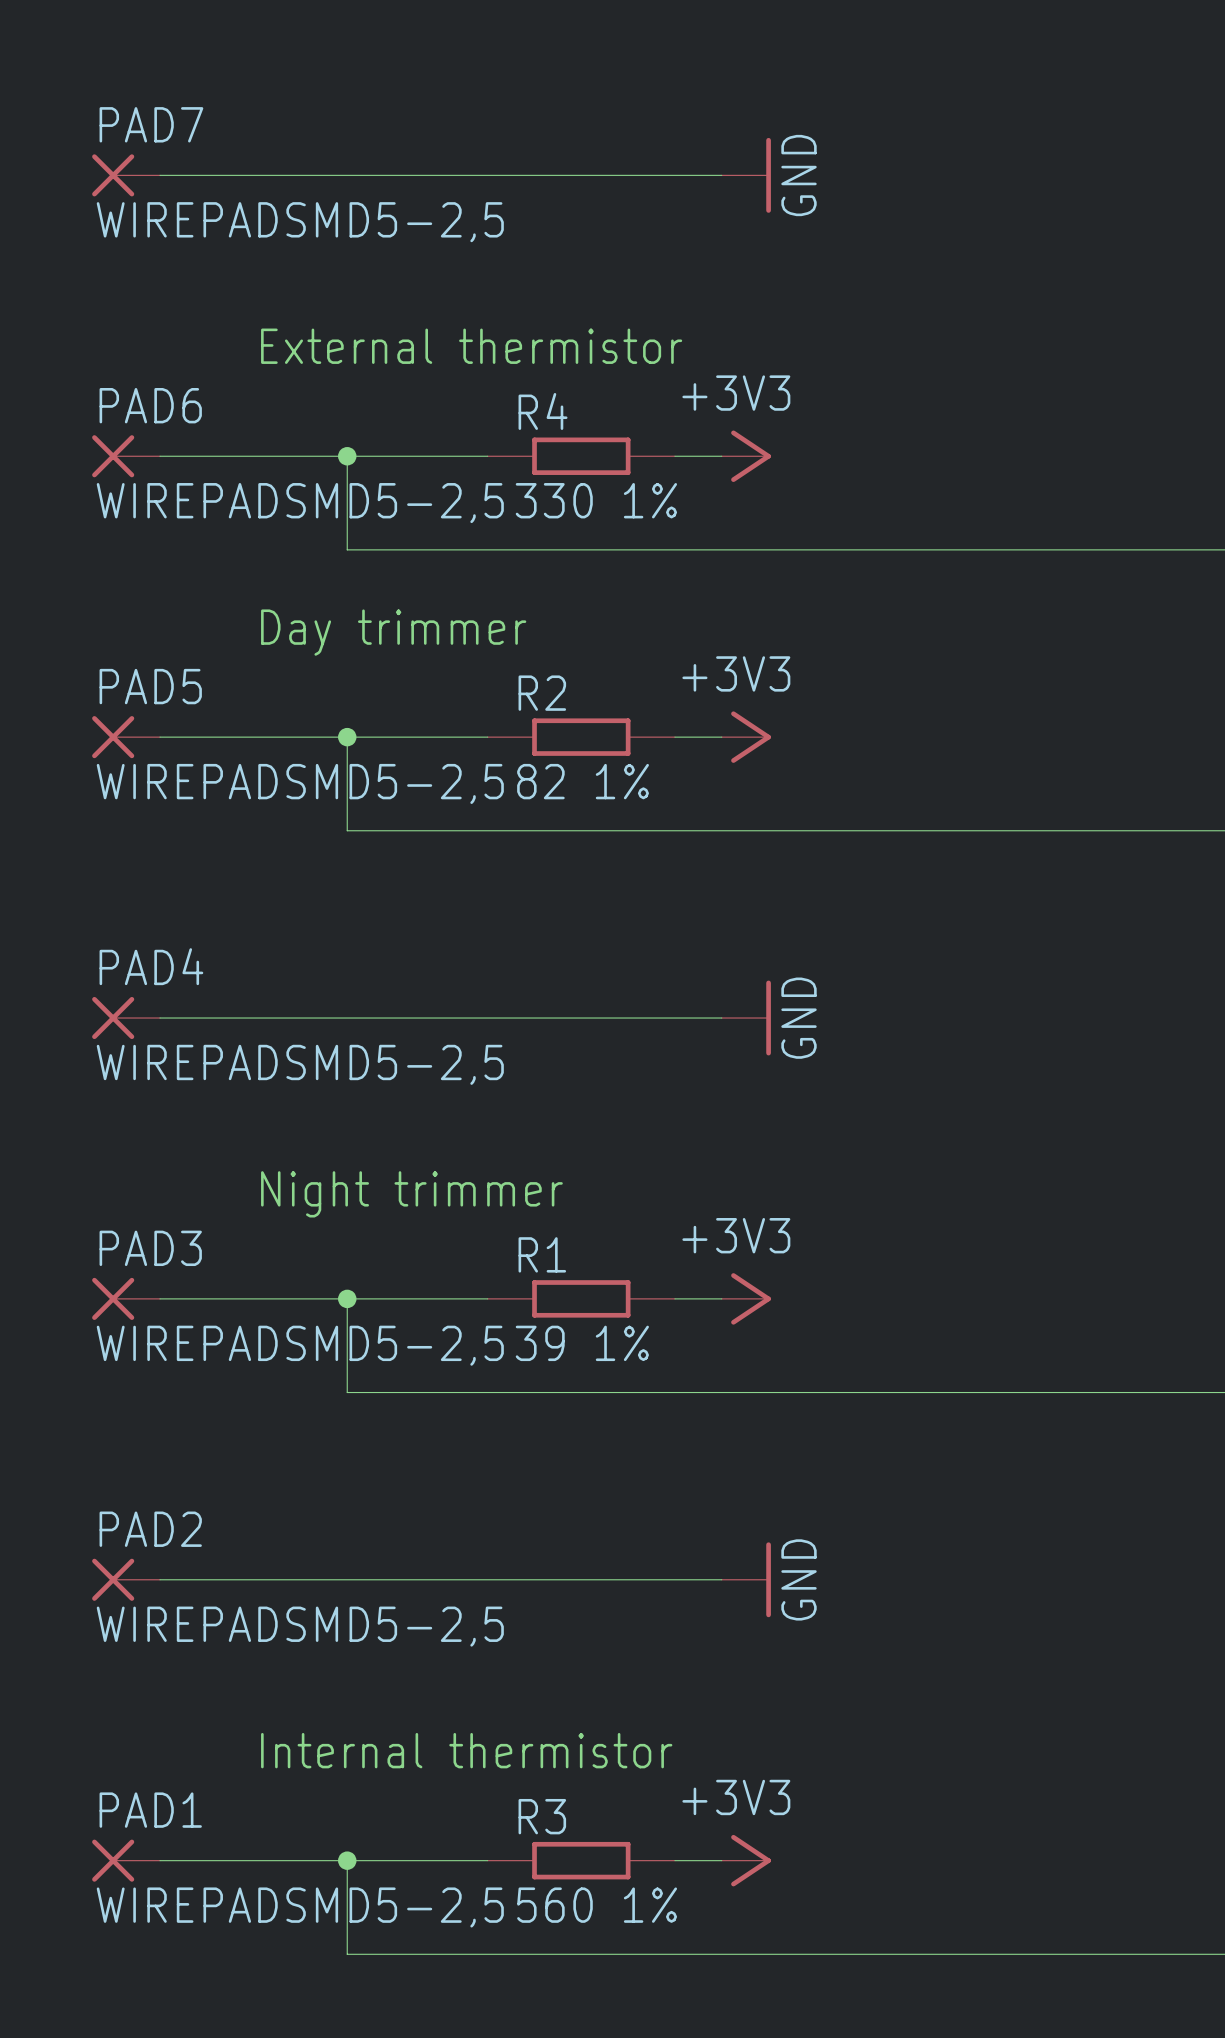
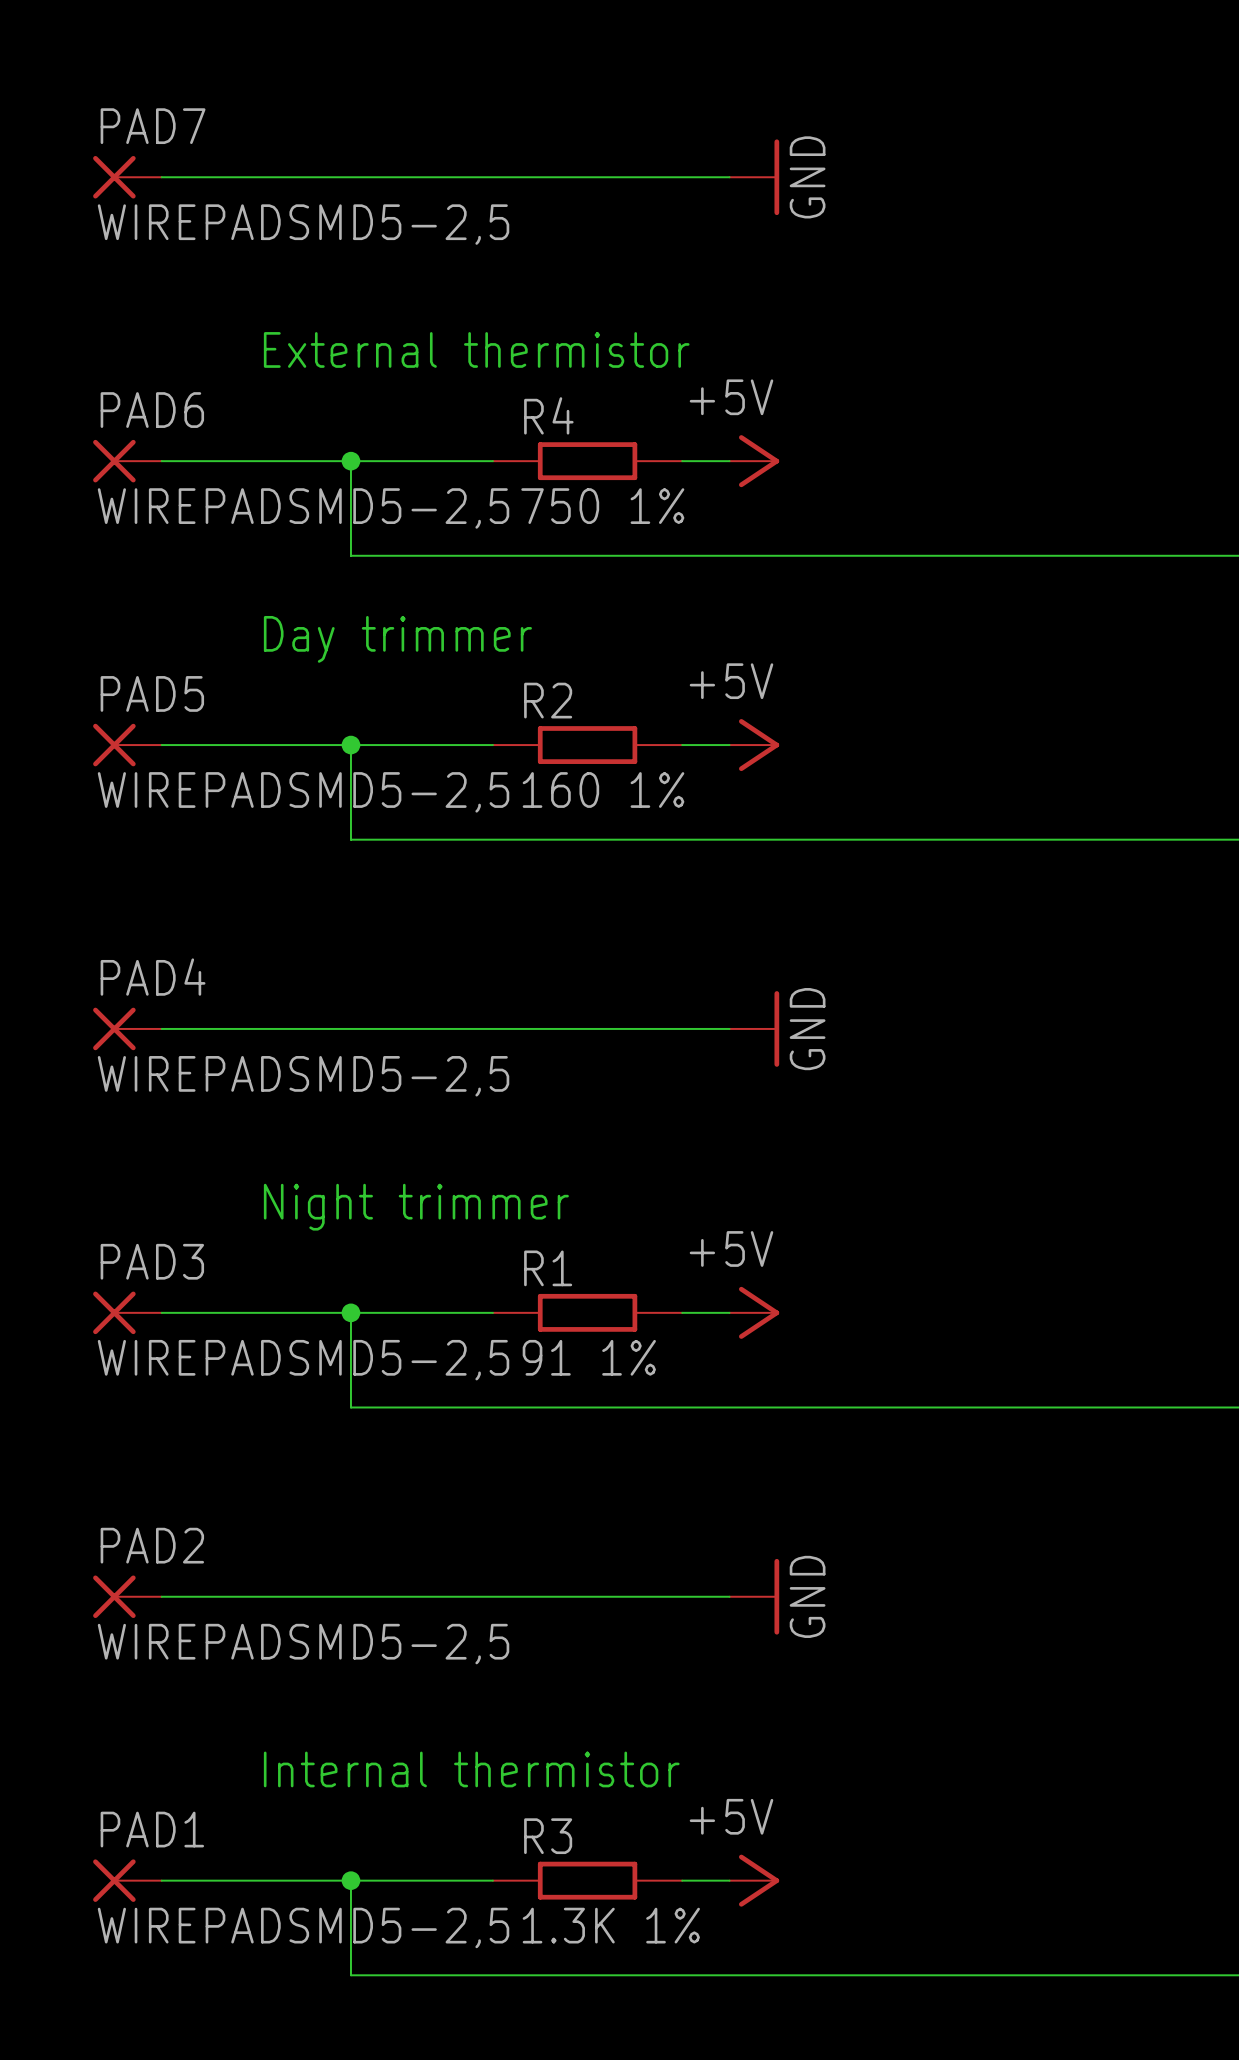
power symbol: +3V3 (746, 456) -> +5V (754, 461)
R4 value: 330 1% (596, 500) -> 750 1% (602, 506)
power symbol: +3V3 (746, 737) -> +5V (754, 745)
R2 value: 82 1% (583, 781) -> 160 1% (603, 790)
power symbol: +3V3 (746, 1298) -> +5V (754, 1312)
R1 value: 39 1% (582, 1343) -> 91 1% (589, 1357)
power symbol: +3V3 (746, 1860) -> +5V (754, 1880)
R3 value: 560 1% (597, 1905) -> 1.3K 1% (611, 1925)

